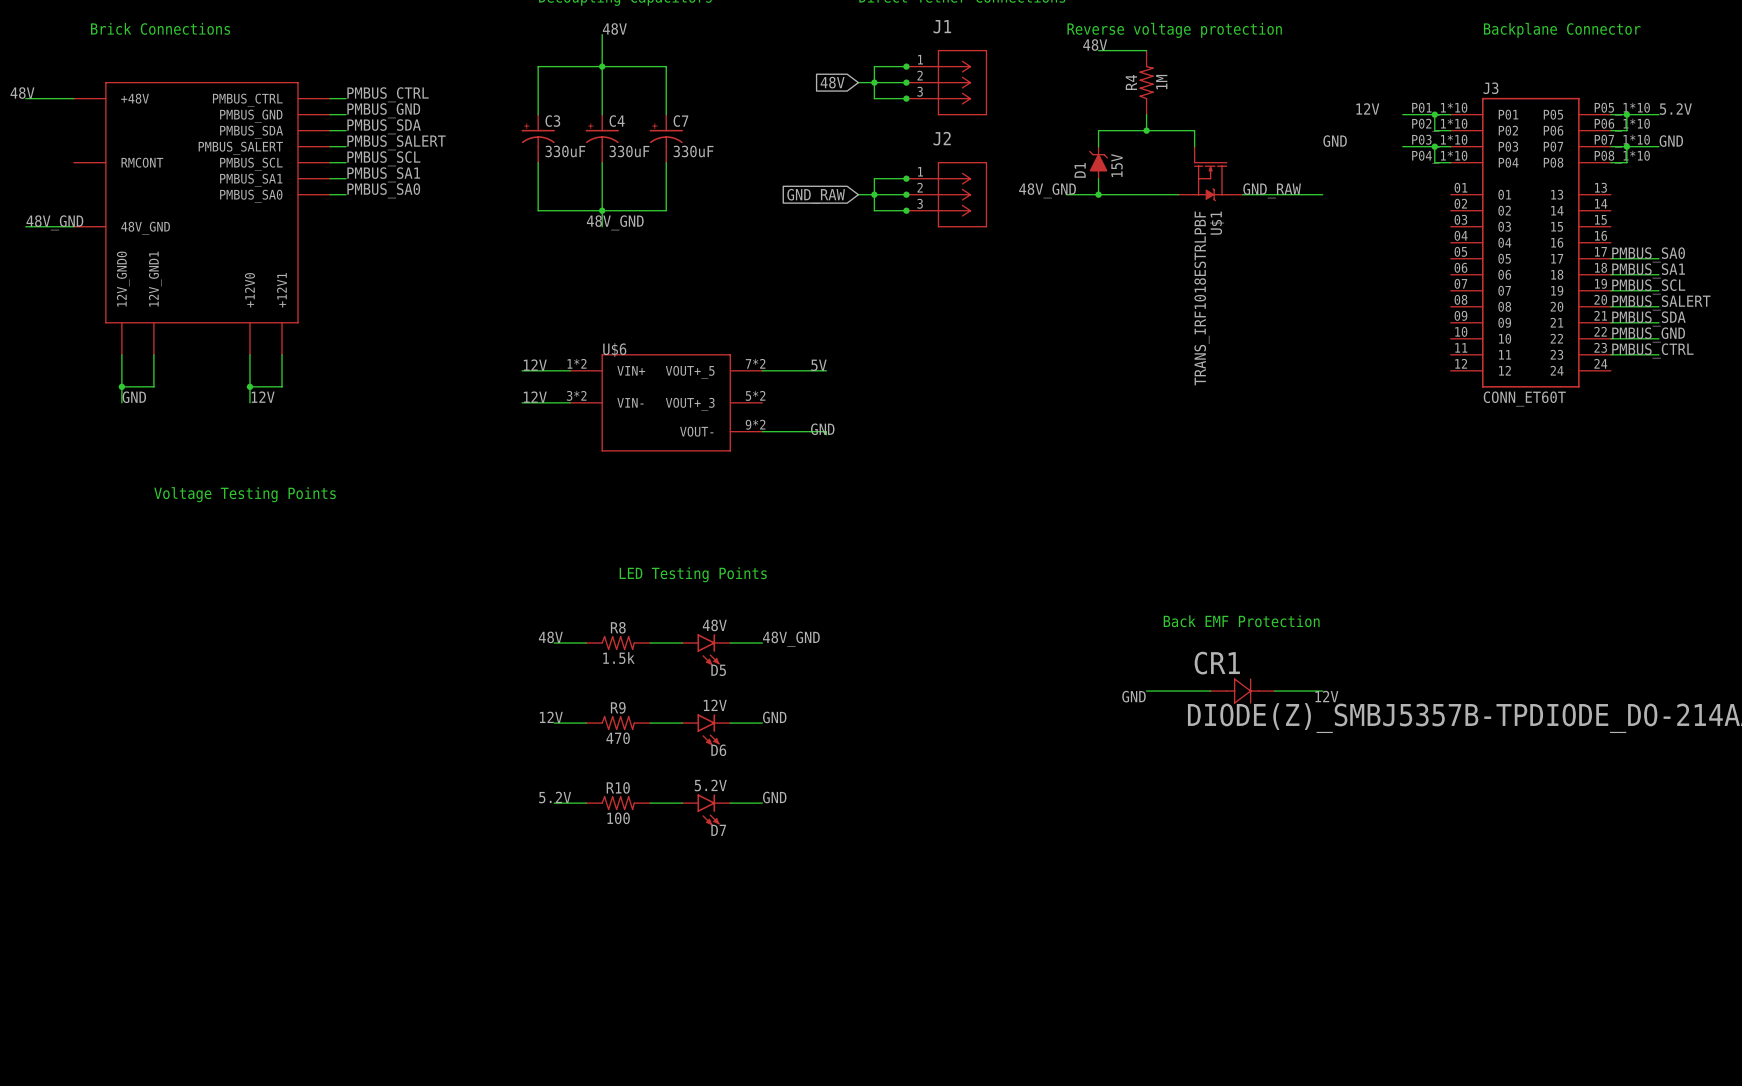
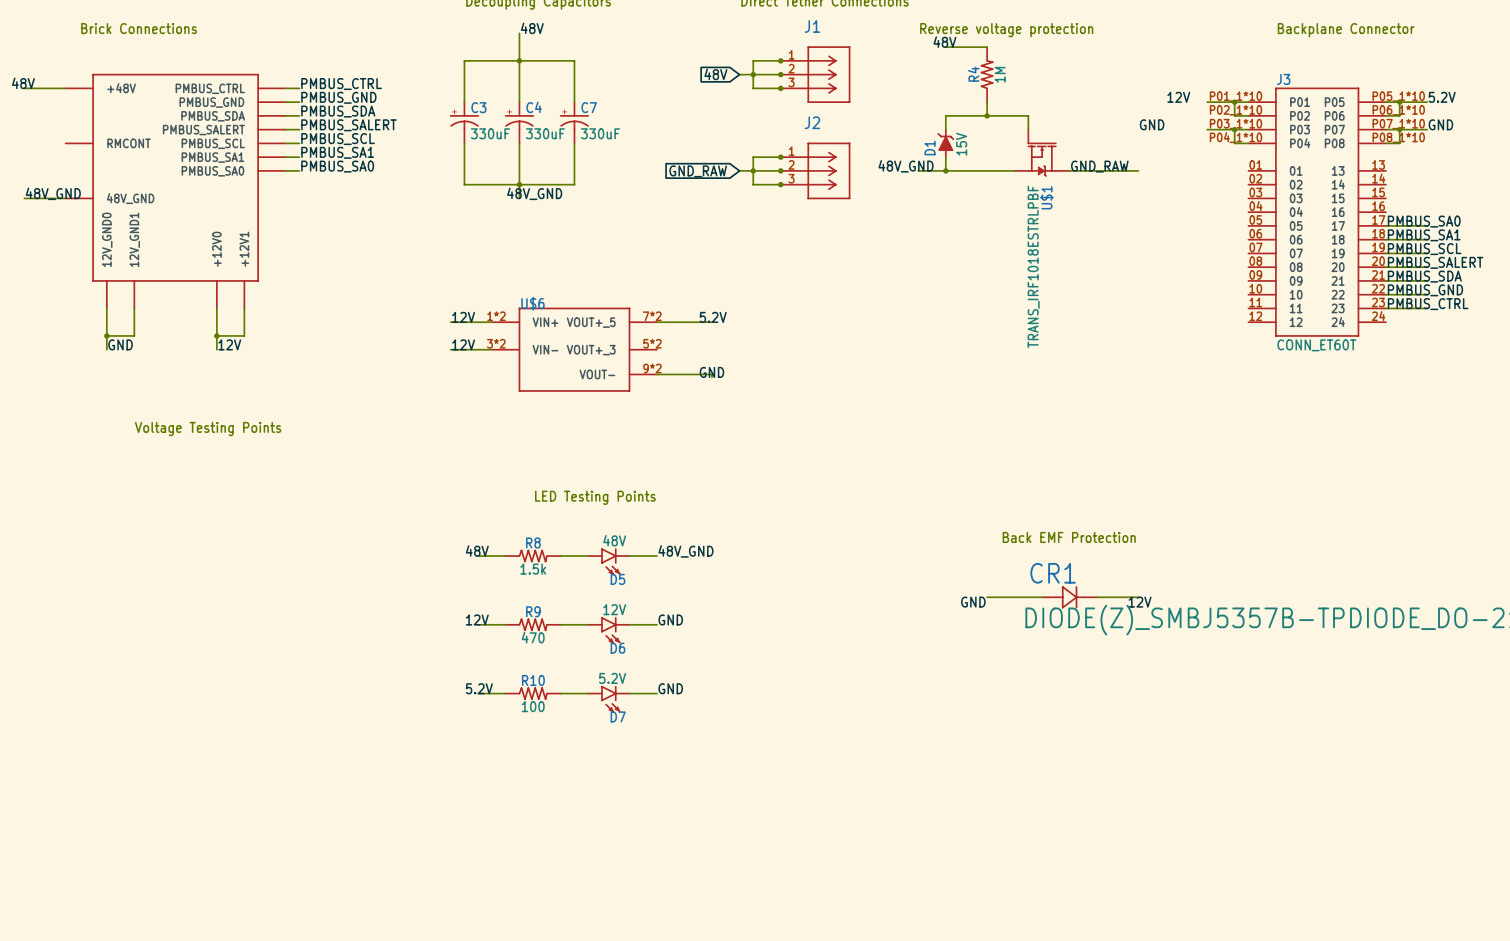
label: 5V (818, 365) -> 5.2V (713, 317)

